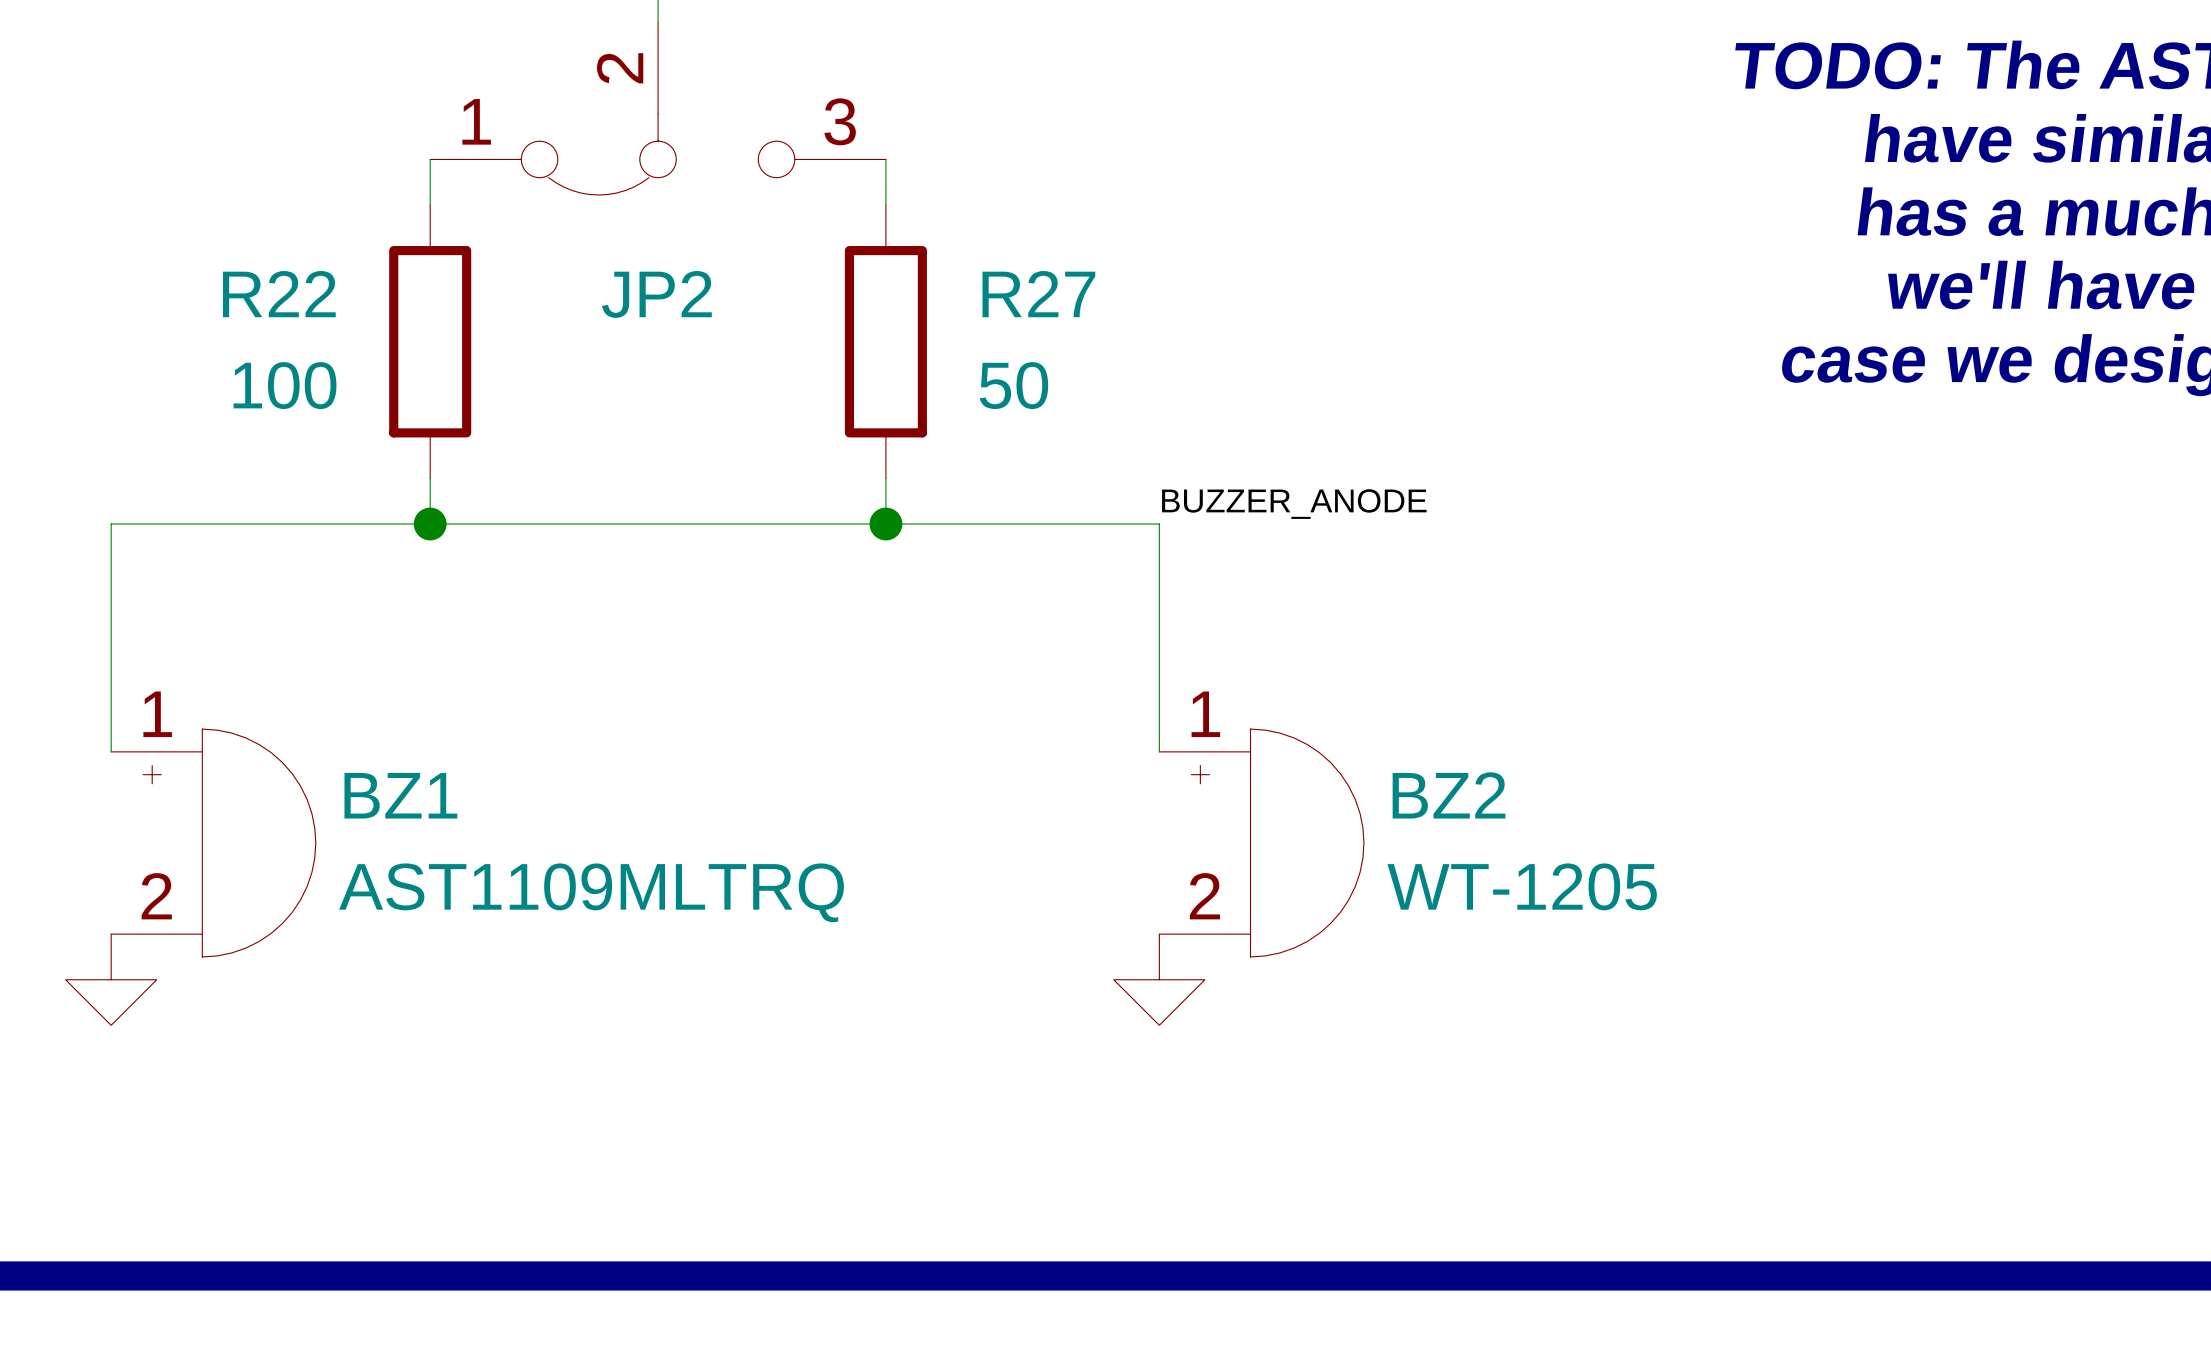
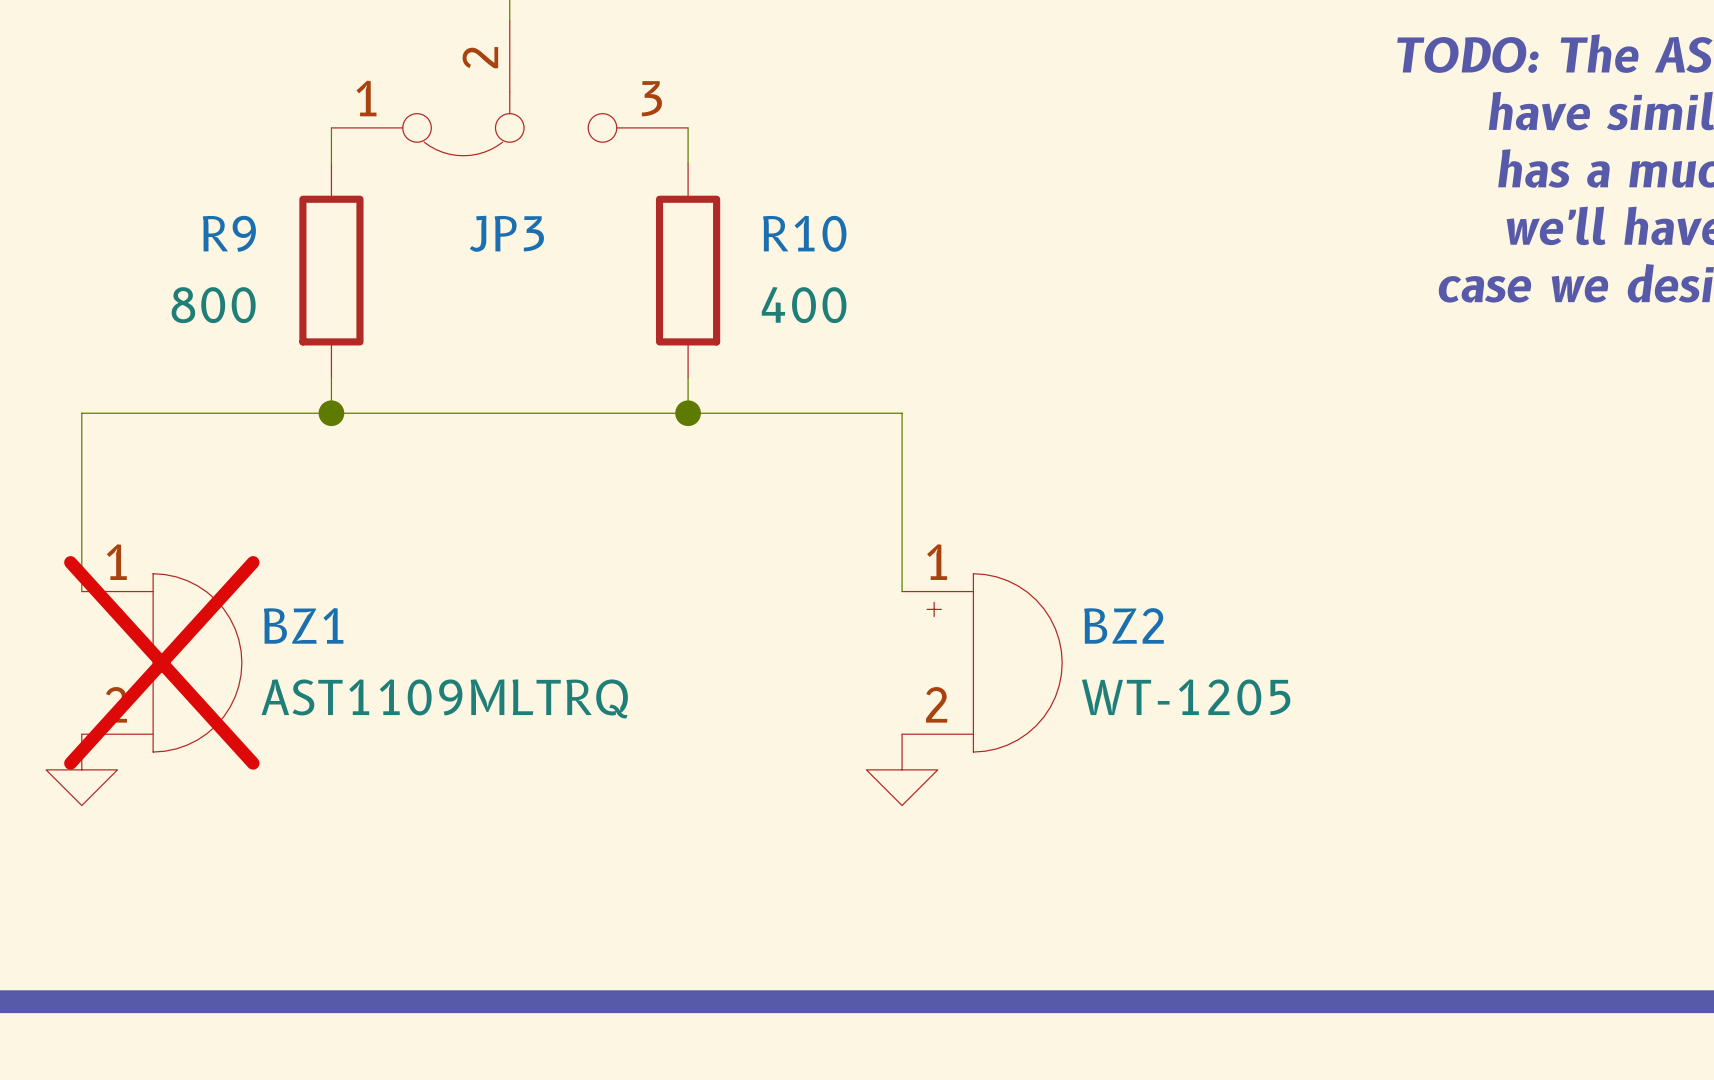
R22 name: R22 (279, 294) -> R9 (229, 233)
JP2 name: JP2 (656, 294) -> JP3 (506, 233)
R27 name: R27 (1038, 294) -> R10 (804, 233)
R22 value: 100 (285, 385) -> 800 (213, 305)
R27 value: 50 (1013, 385) -> 400 (804, 305)
label: BUZZER_ANODE (1294, 504) -> none
BZ1 do-not-place cross: none -> (161, 662)

